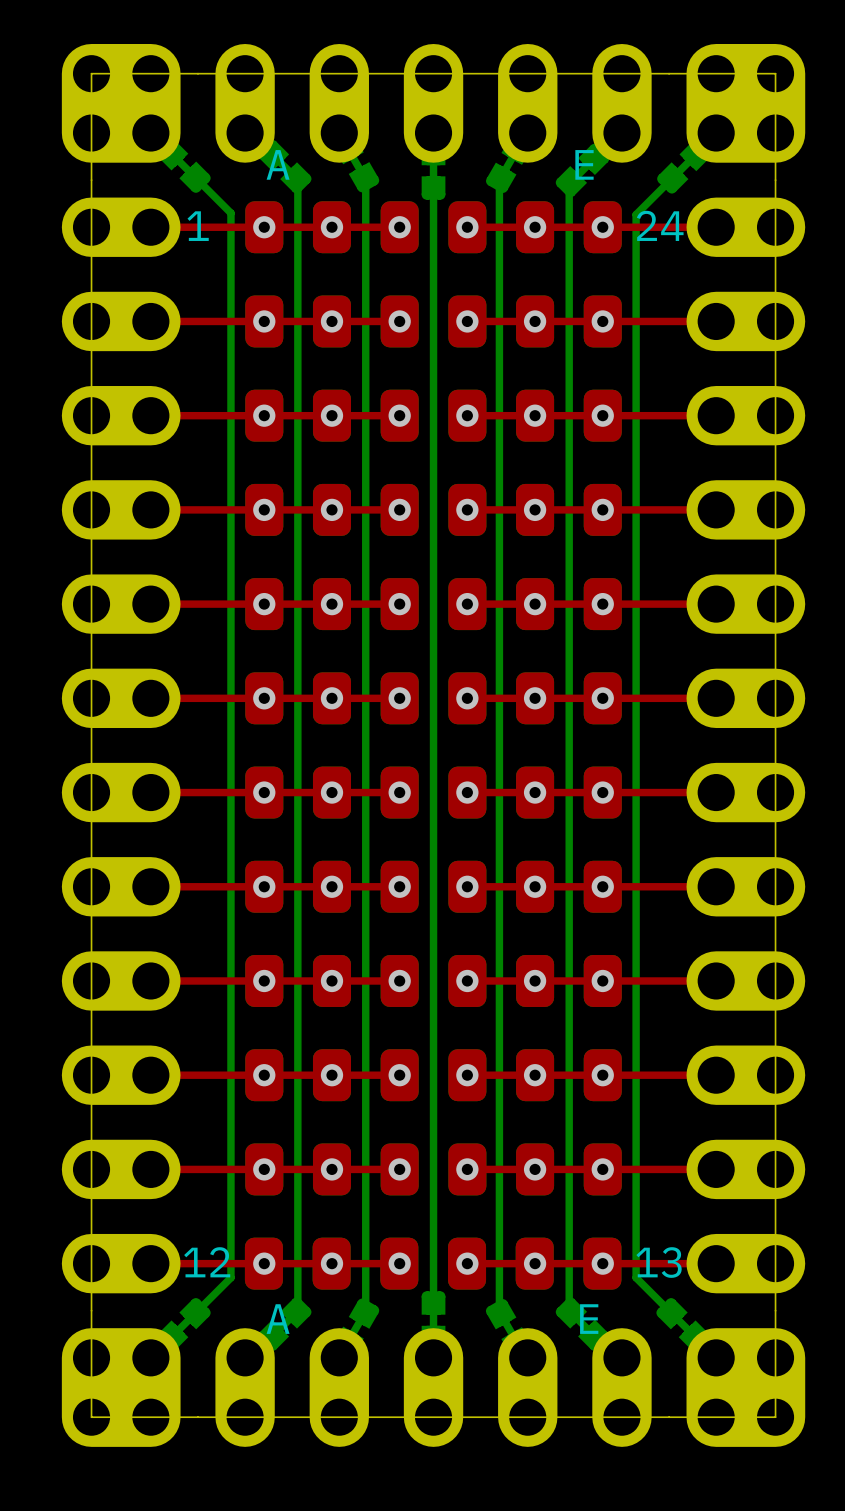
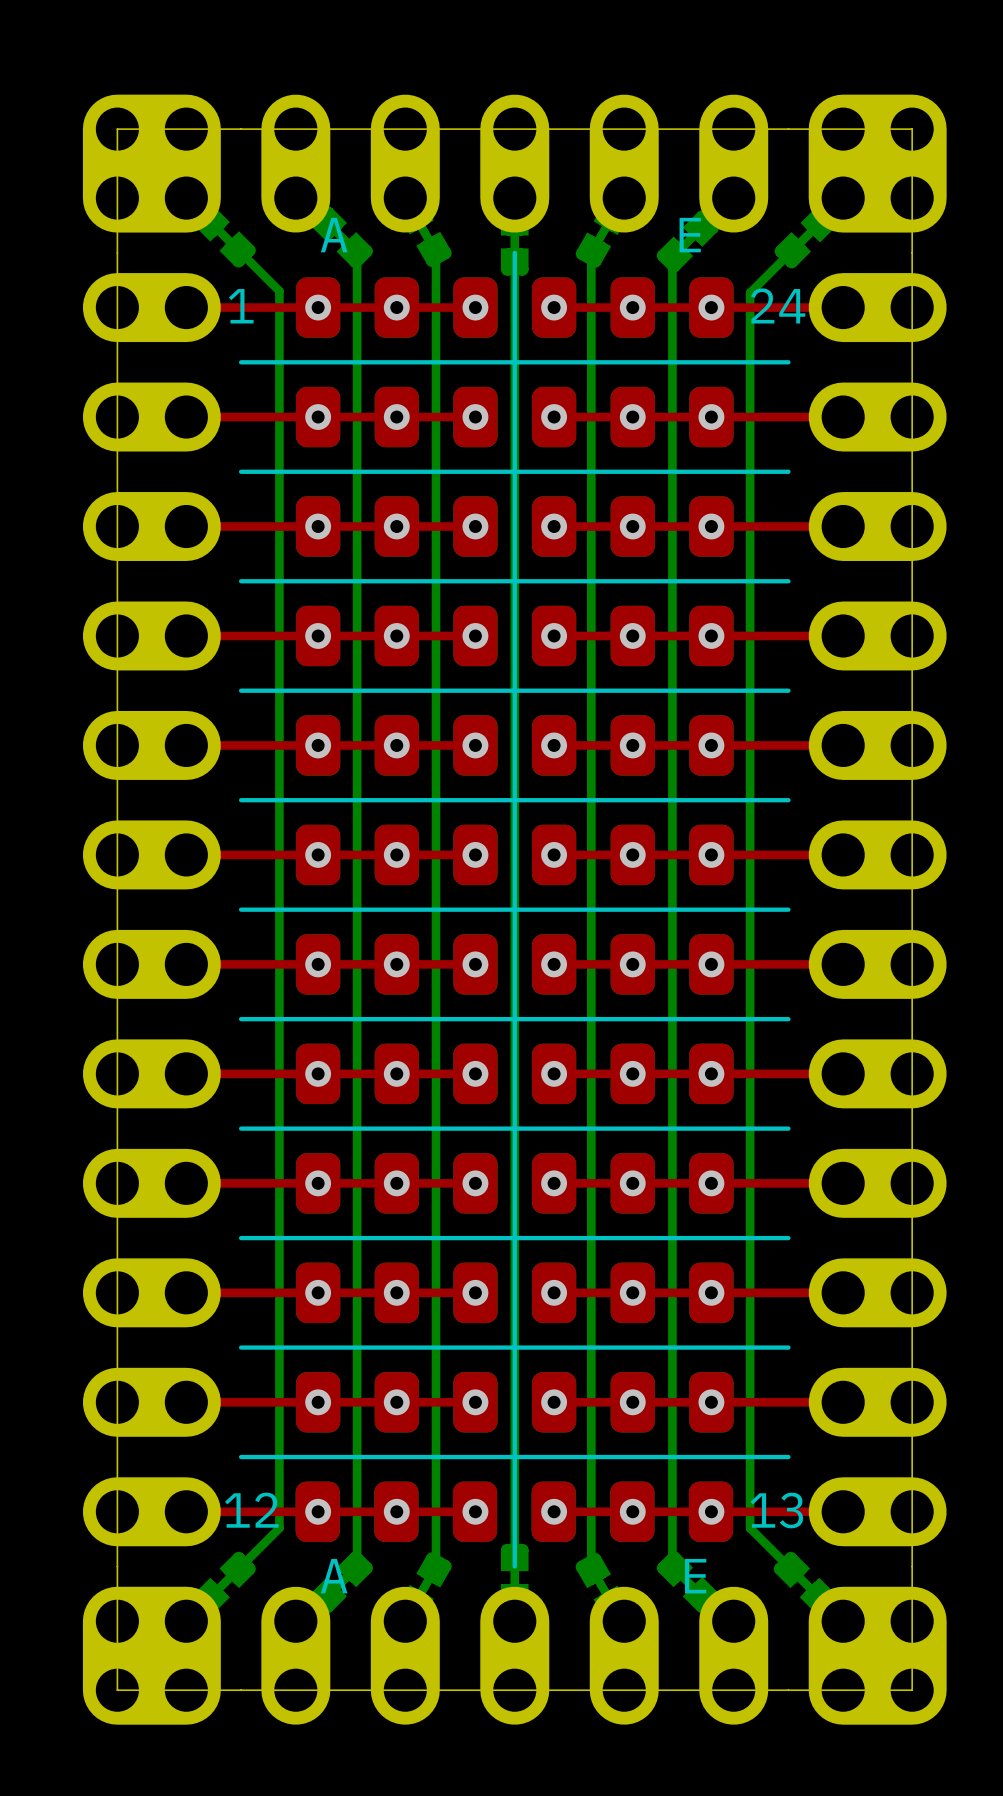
line: none -> (514, 252) (514, 1566)
line: none -> (241, 362) (788, 362)
line: none -> (241, 471) (788, 471)
line: none -> (241, 581) (788, 581)
line: none -> (241, 690) (788, 690)
line: none -> (241, 800) (788, 800)
line: none -> (241, 909) (788, 909)
line: none -> (241, 1019) (788, 1019)
line: none -> (241, 1128) (788, 1128)
line: none -> (241, 1238) (788, 1238)
line: none -> (241, 1347) (788, 1347)
line: none -> (241, 1457) (788, 1457)

